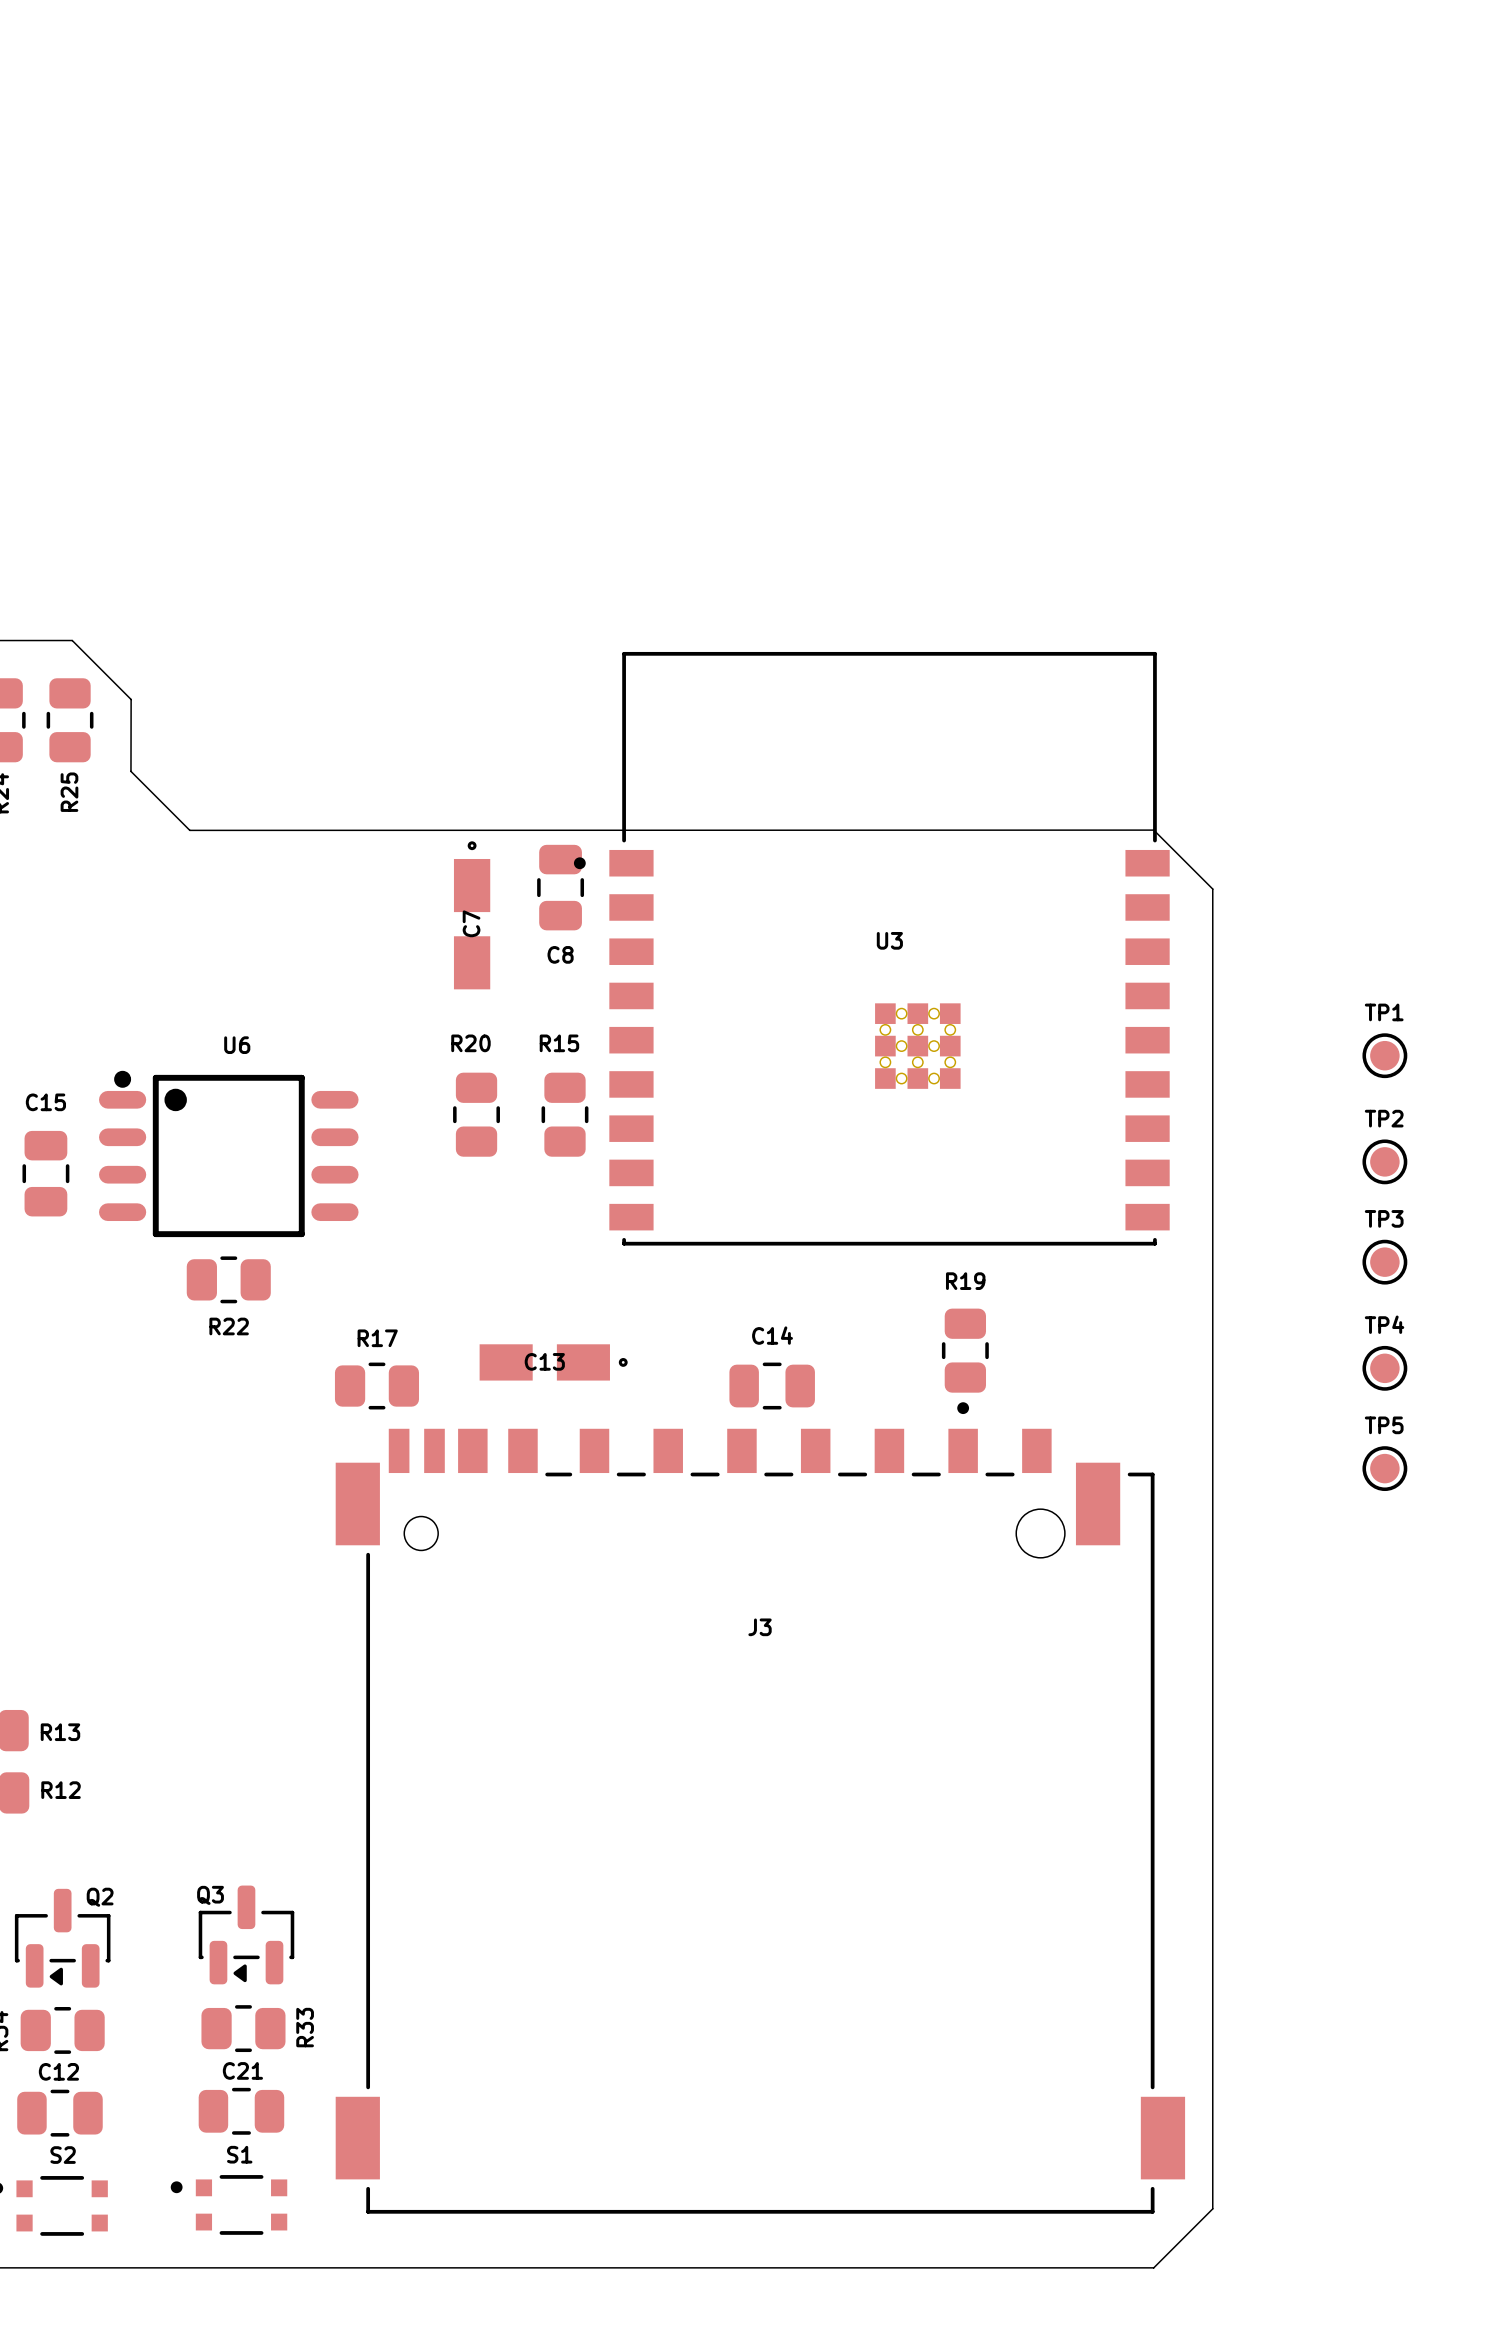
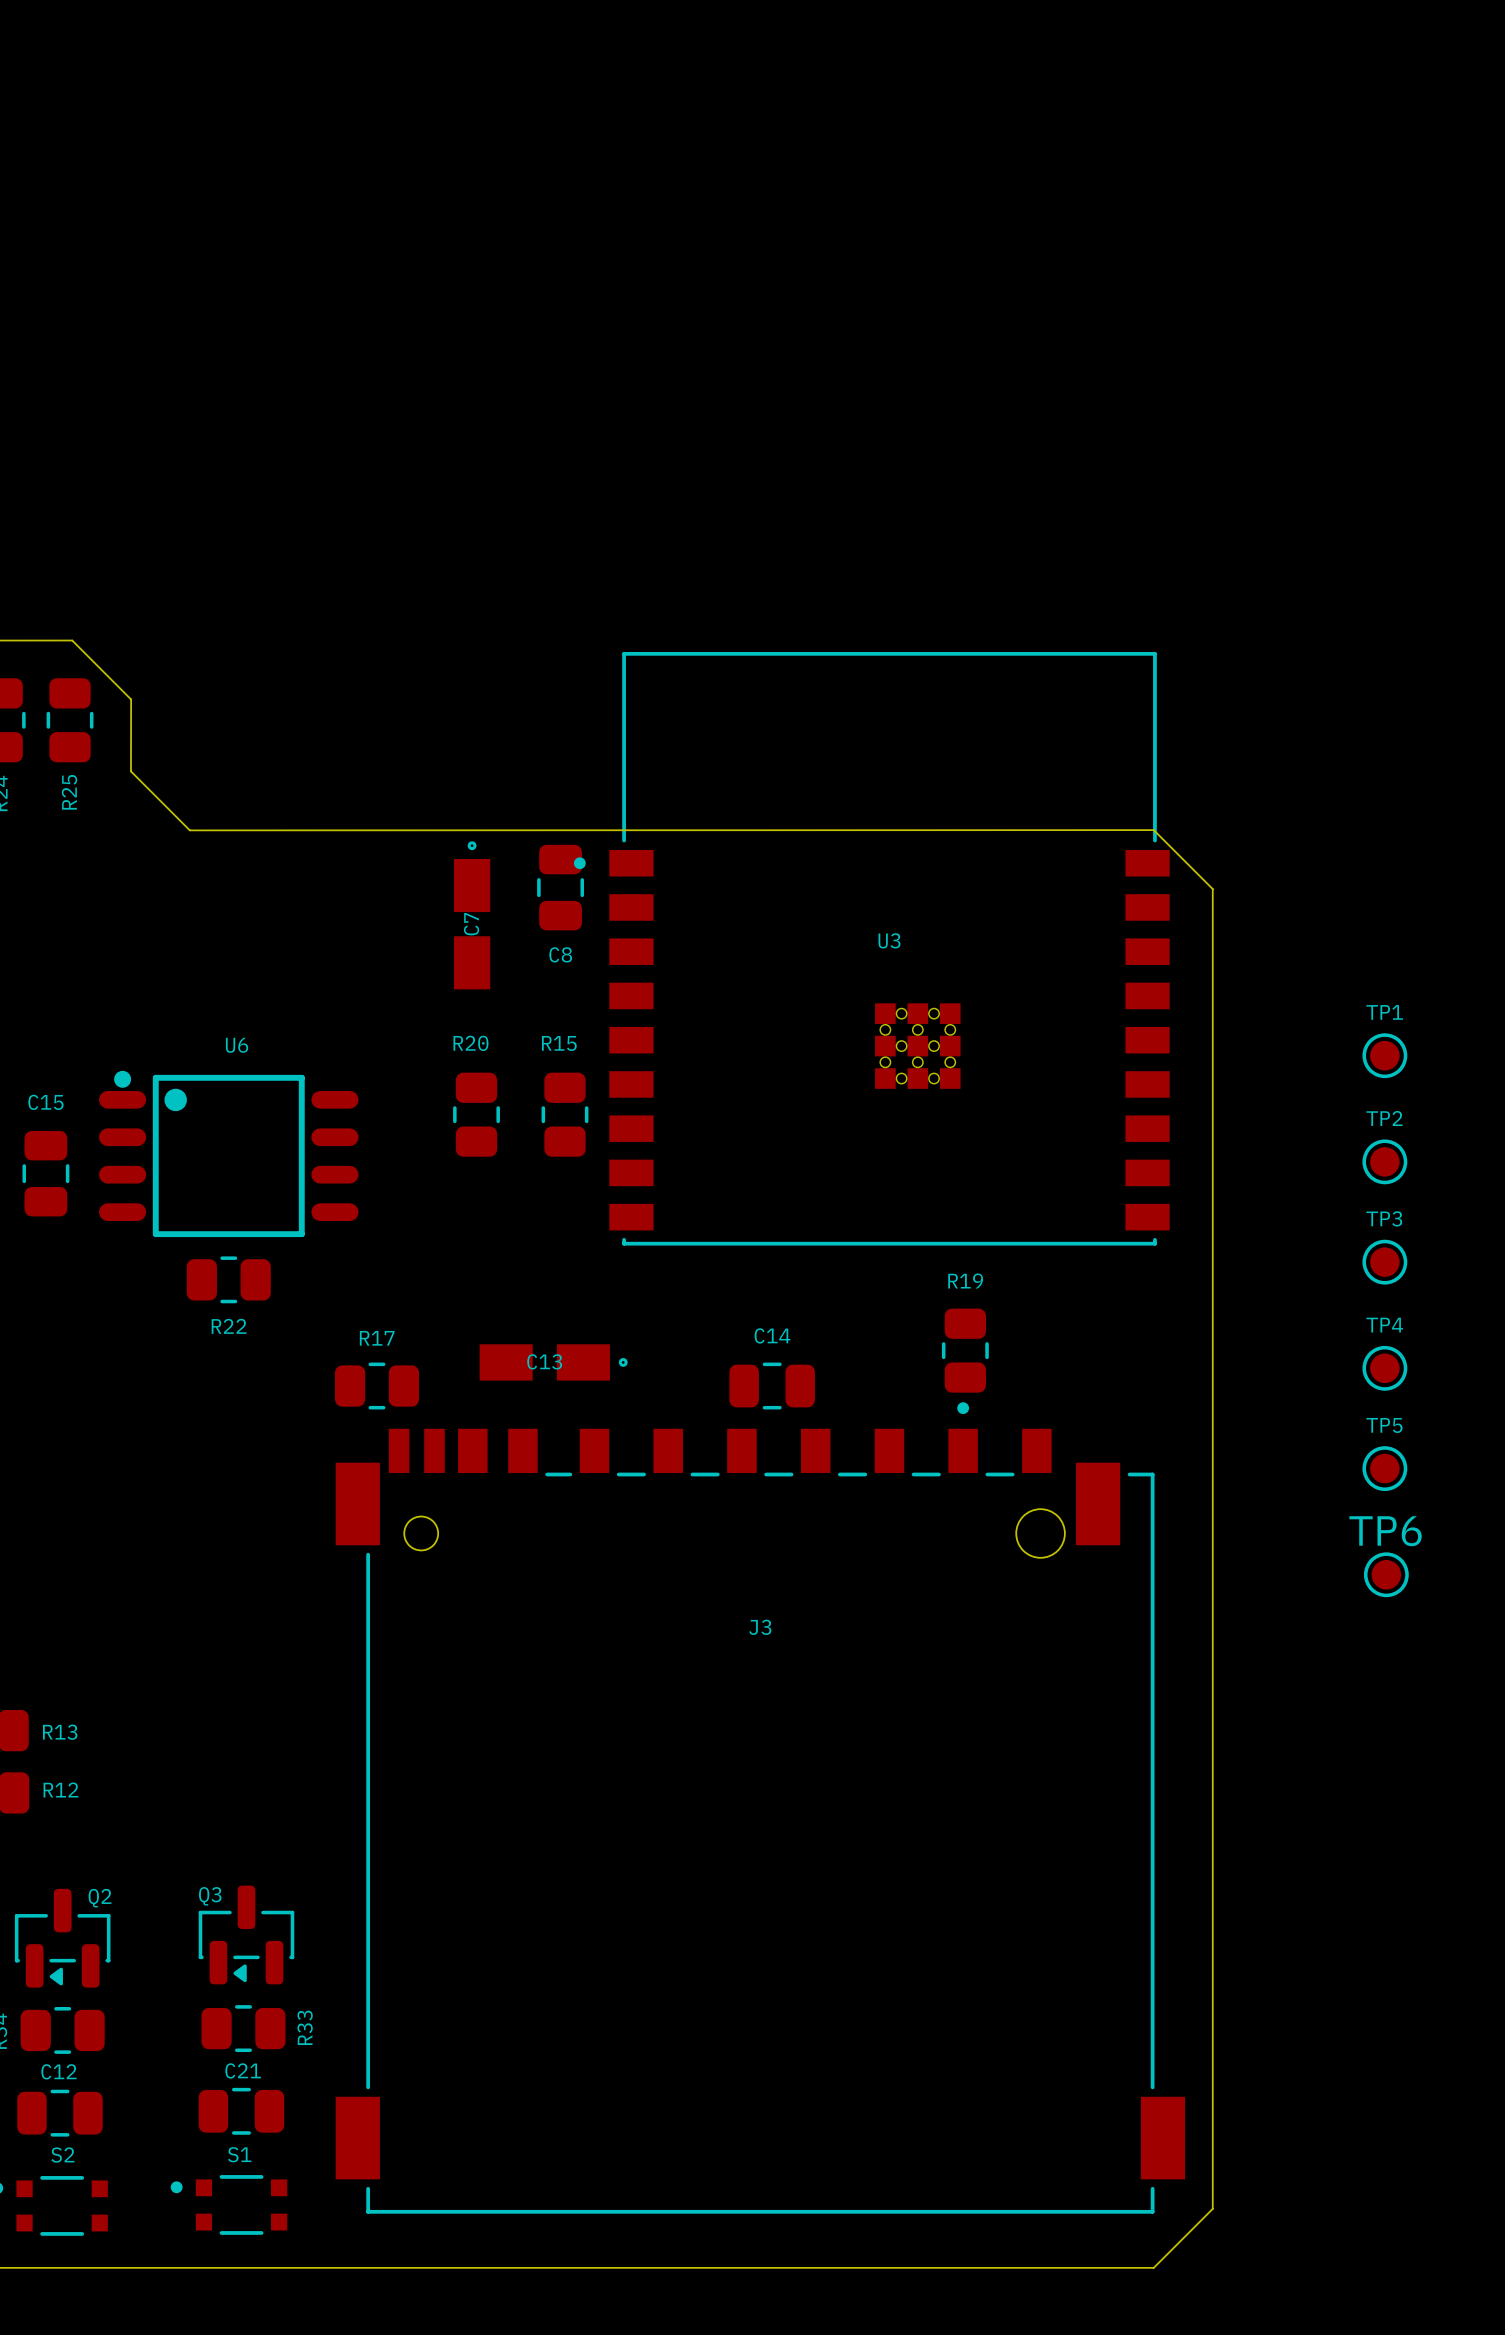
TP6: none -> (1386, 1574)

